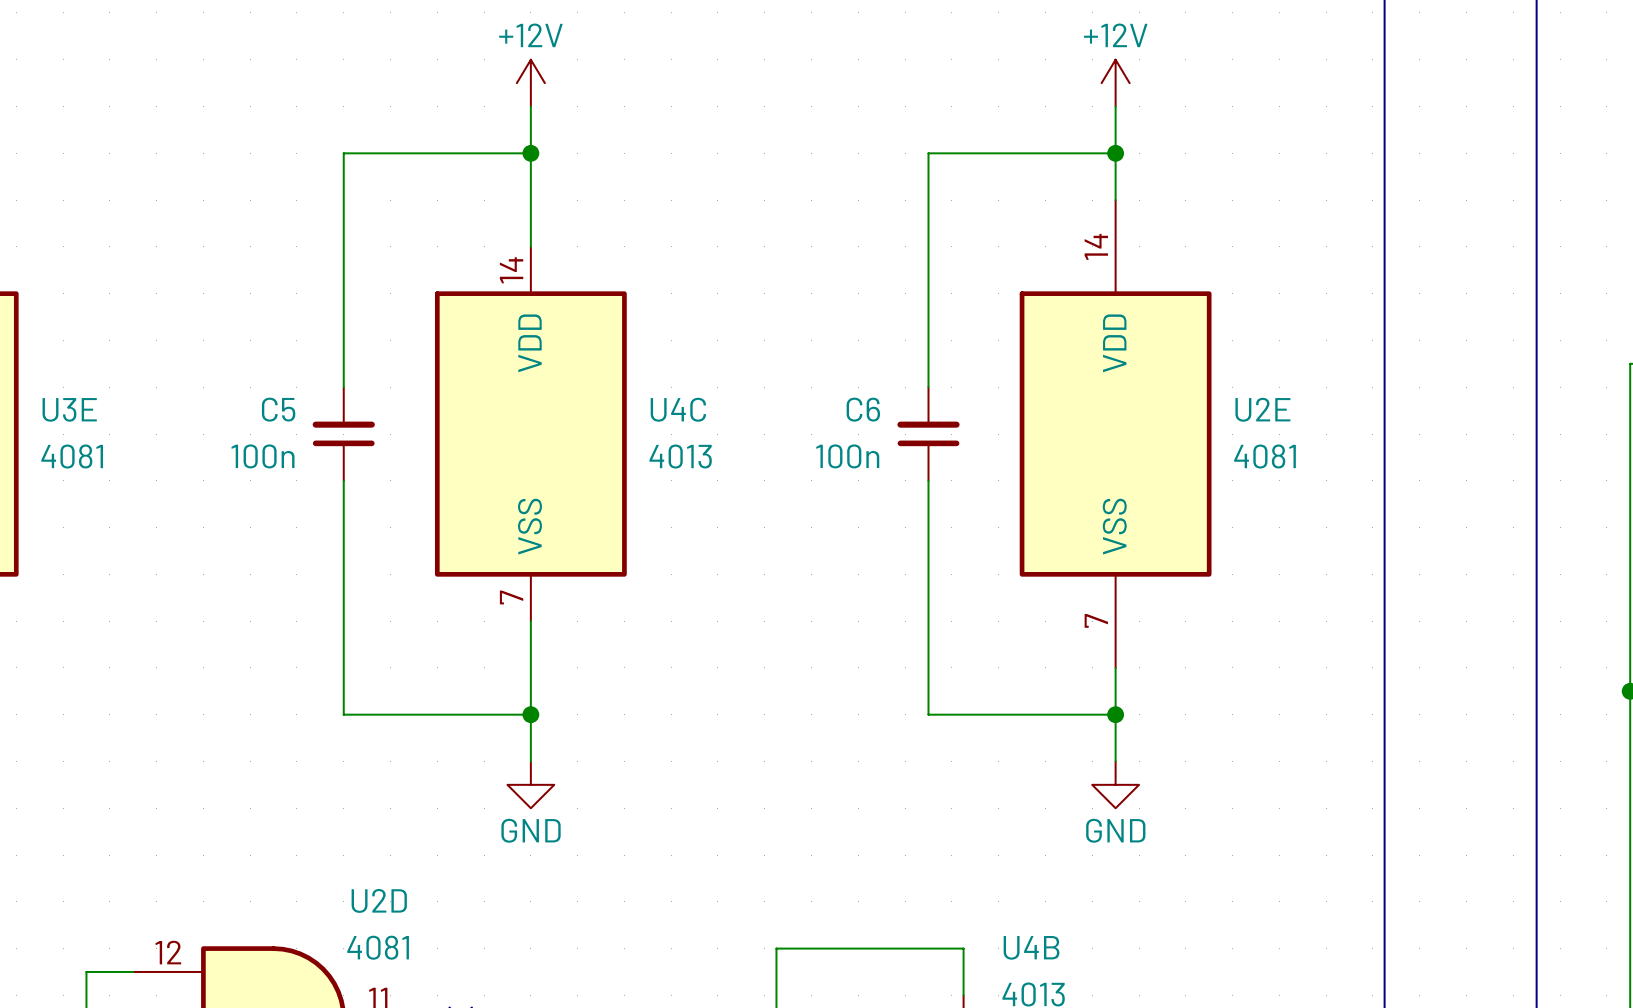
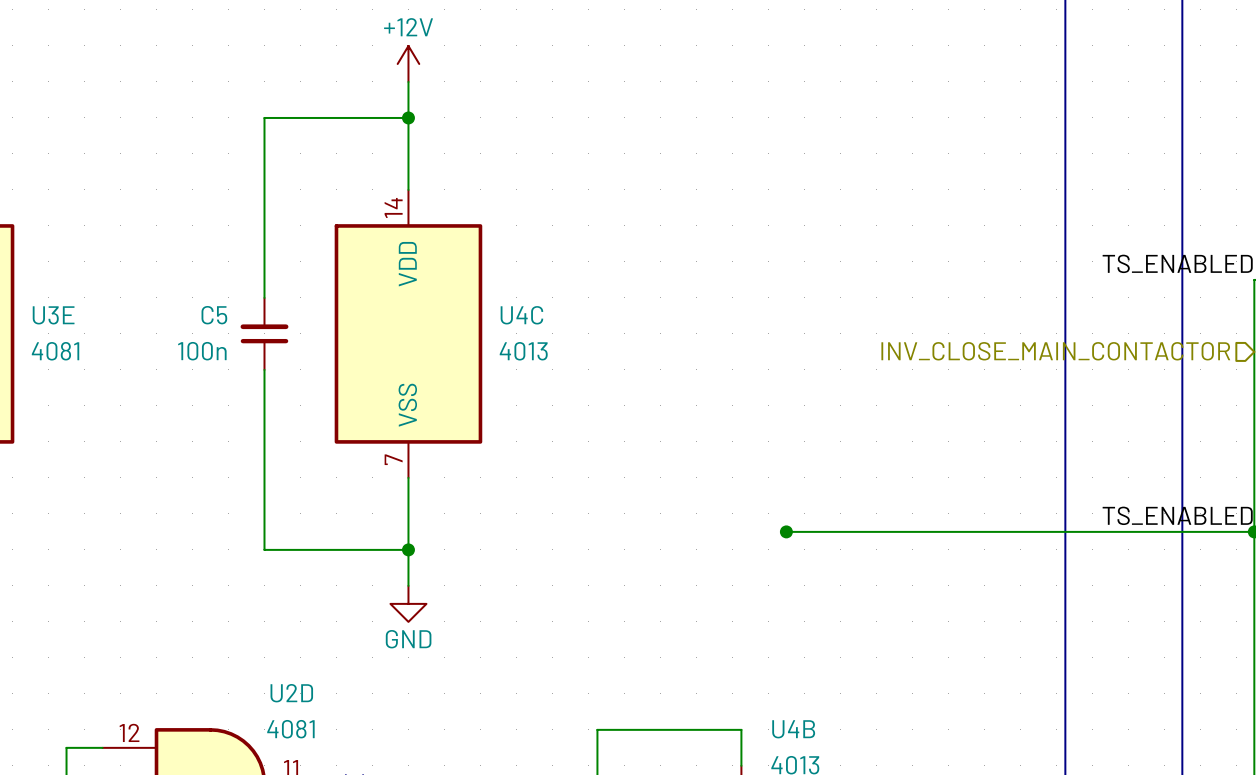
power symbol: +12V (1115, 83) -> none
wire: (1115, 106) (1115, 200) -> none
wire: (1115, 153) (928, 153) (928, 387) -> none
junction: (1115, 153) -> none
label: none -> TS_ENABLED (1177, 263)
C6: 100n (928, 434) -> none
U2E: 4081 (1115, 434) -> none
hierarchical label: none -> INV_CLOSE_MAIN_CONTACTOR (1055, 351)
wire: (928, 480) (928, 714) (1115, 714) -> none
wire: (1115, 667) (1115, 761) -> none
label: none -> TS_ENABLED (1177, 515)
wire: none -> (786, 531) (1254, 531)
junction position: (1115, 714) -> (786, 531)
power symbol: GND (1115, 784) -> none

